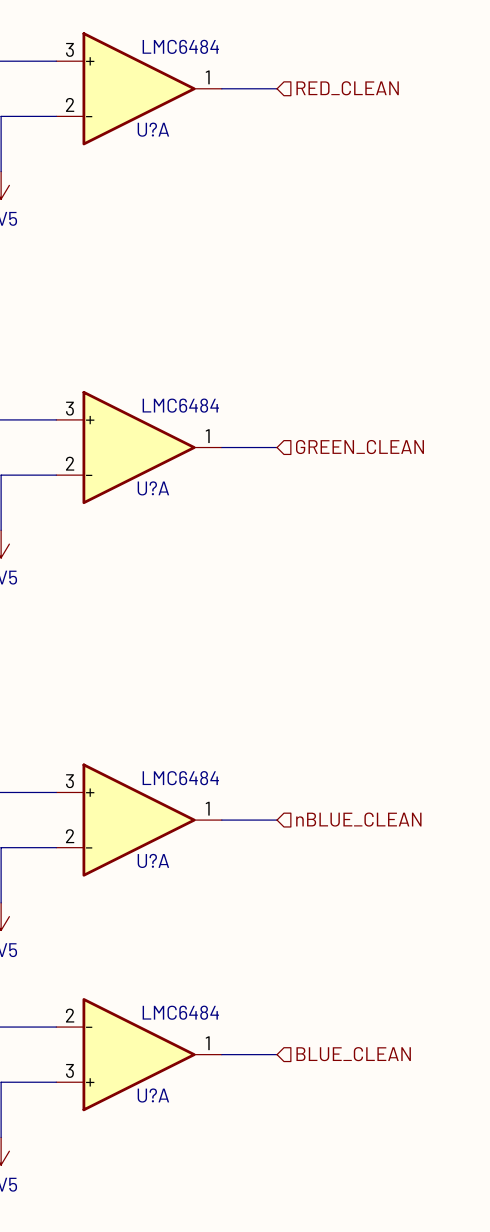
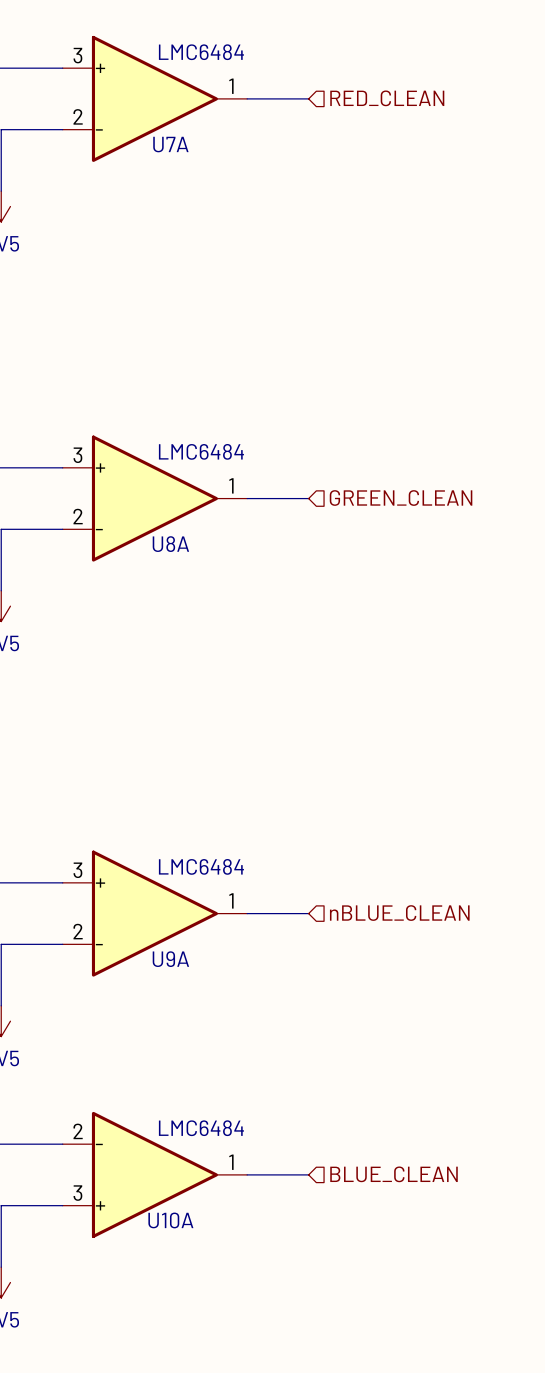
U?A name: U?A (153, 129) -> U7A (170, 144)
U?A name: U?A (153, 488) -> U8A (170, 544)
U?A name: U?A (153, 860) -> U9A (170, 959)
U?A name: U?A (153, 1095) -> U10A (170, 1220)

